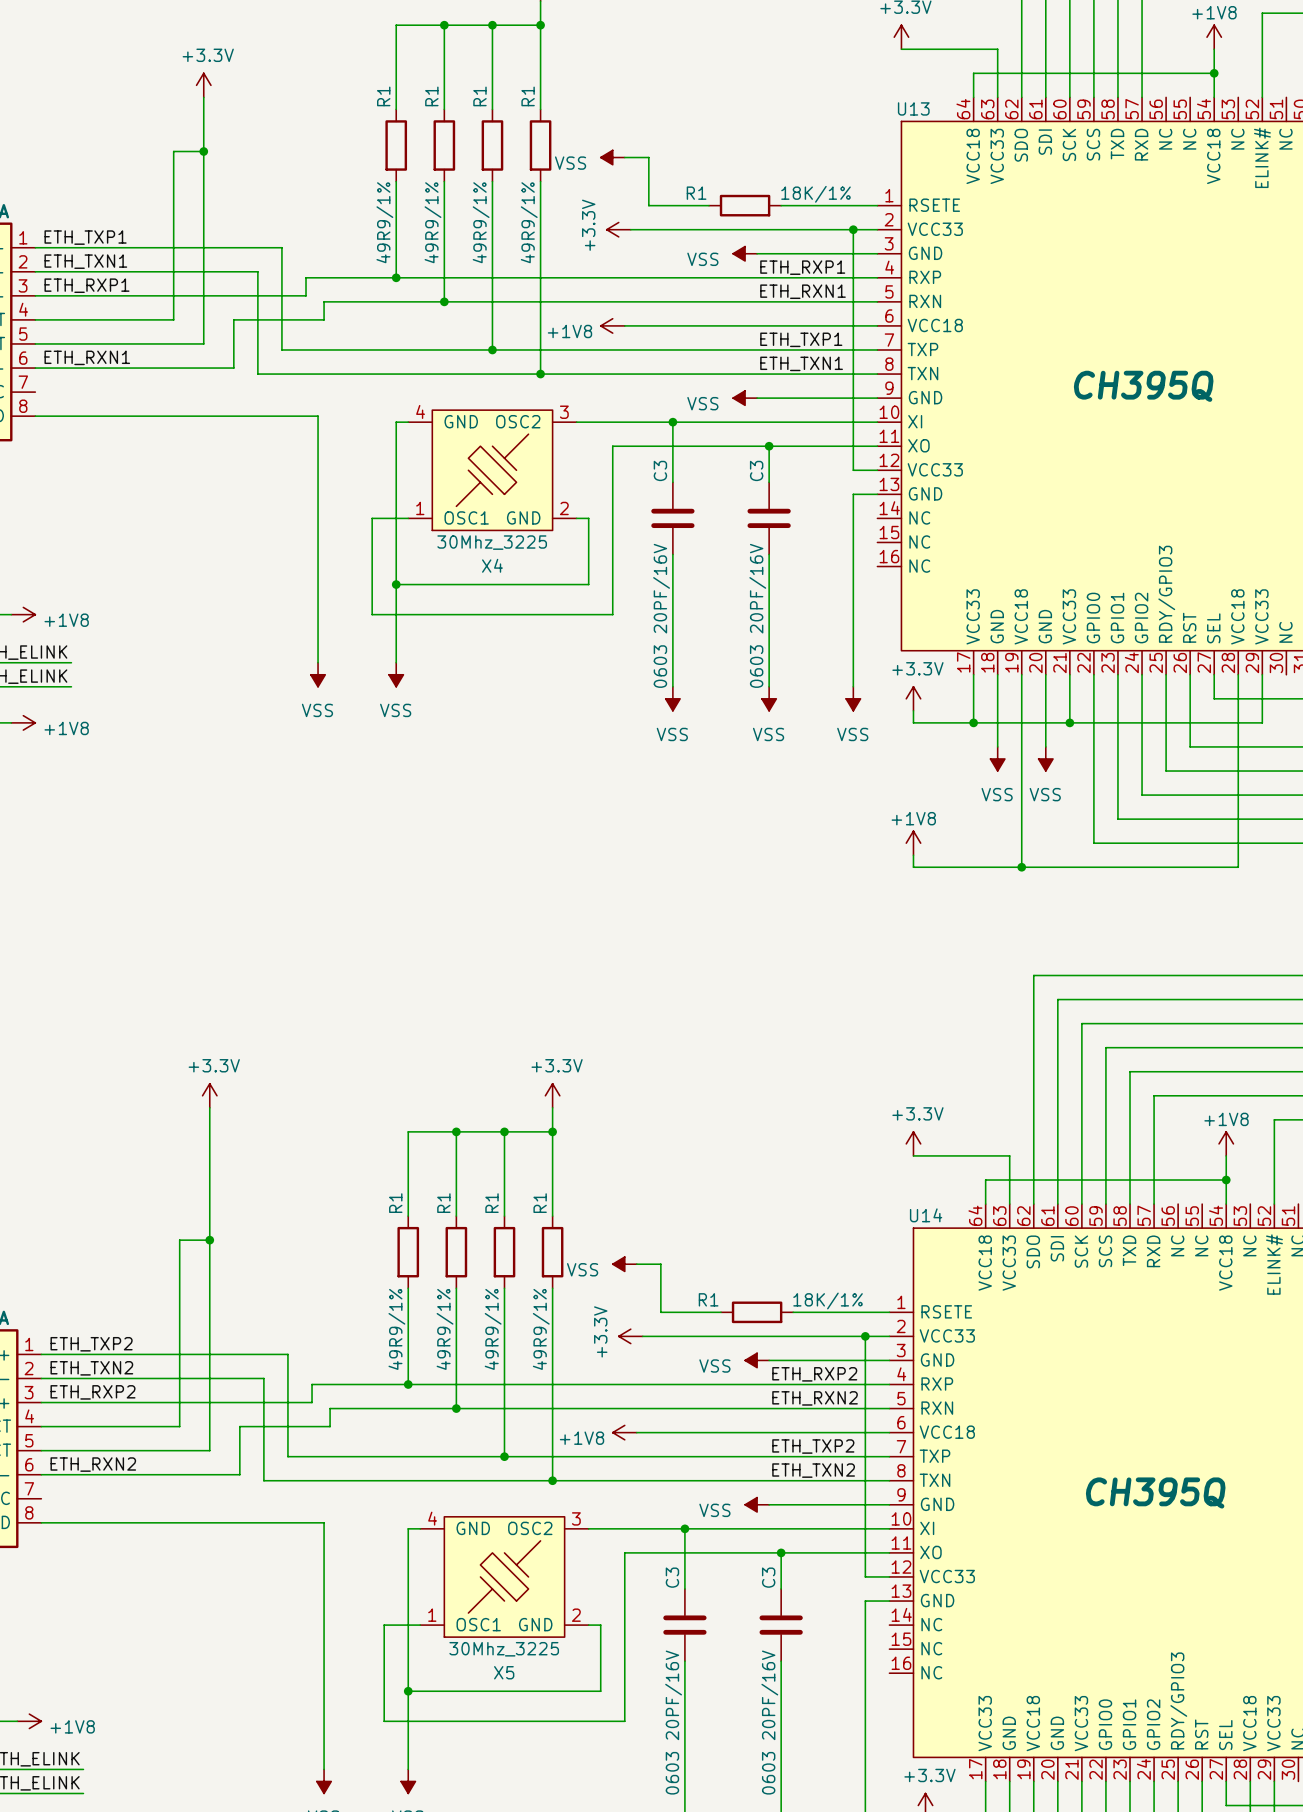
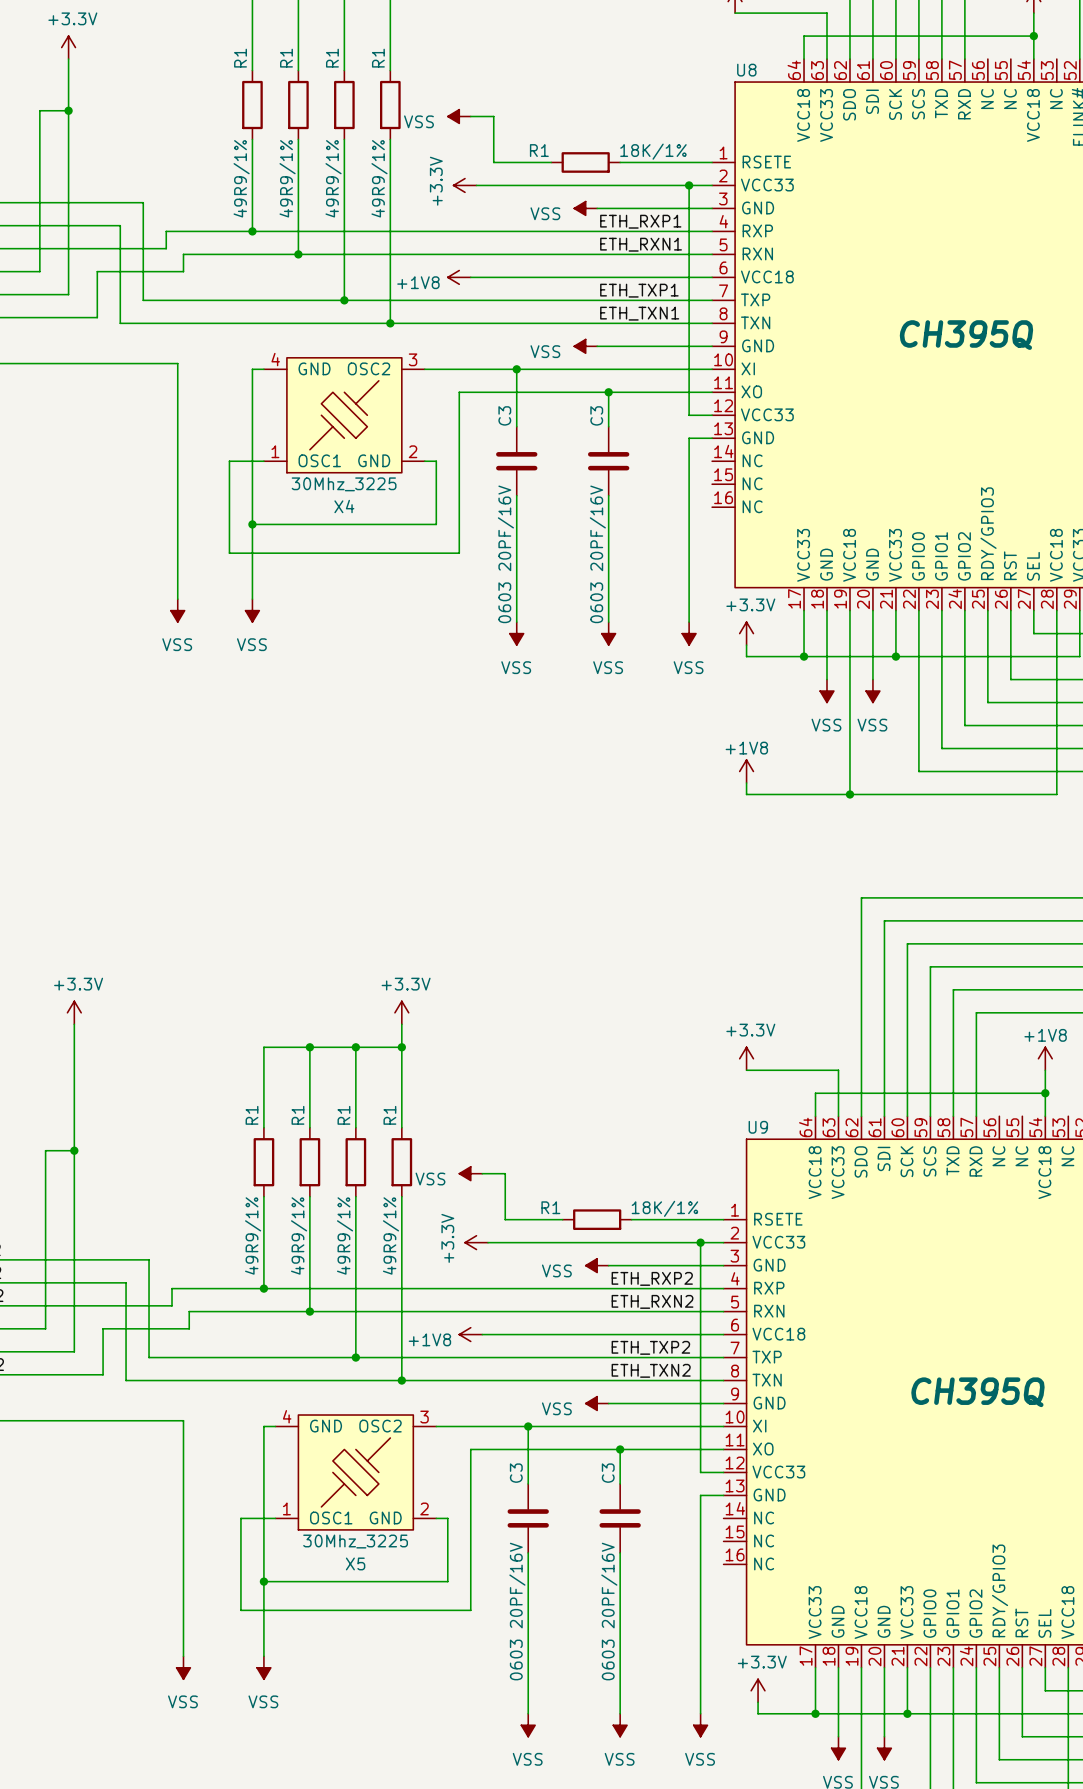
U13 name: U13 (913, 108) -> U8 (746, 70)
U14 name: U14 (926, 1215) -> U9 (758, 1127)

